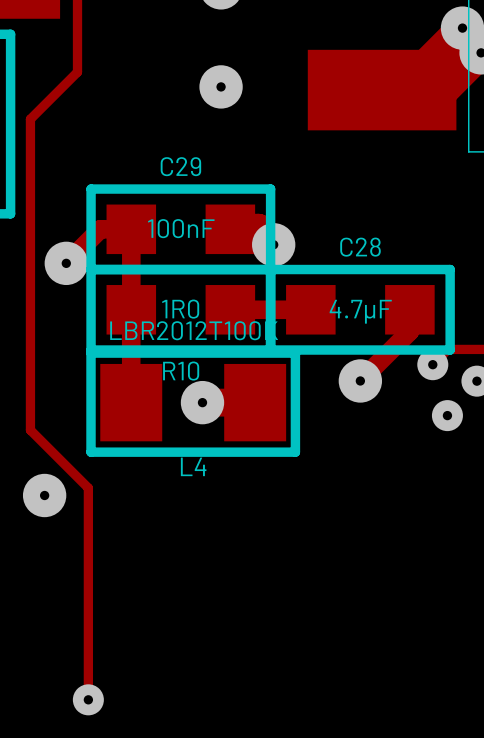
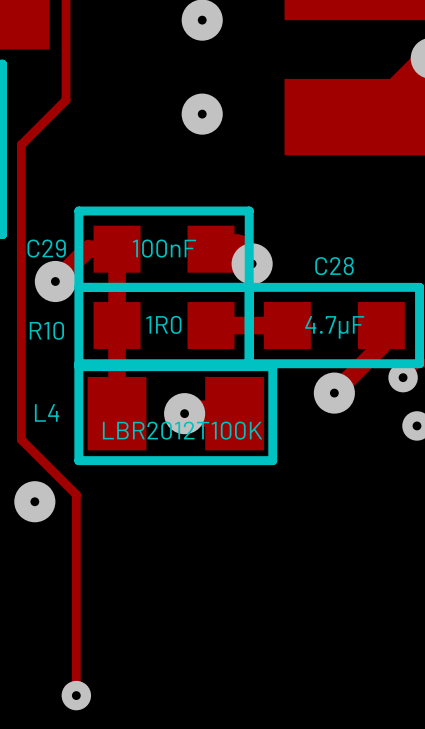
C29 name position: C29 (180, 166) -> C29 (46, 248)
L4 value position: LBR2012T100K (194, 330) -> LBR2012T100K (182, 430)
R10 name position: R10 (181, 371) -> R10 (46, 330)
L4 name position: L4 (193, 466) -> L4 (47, 412)

